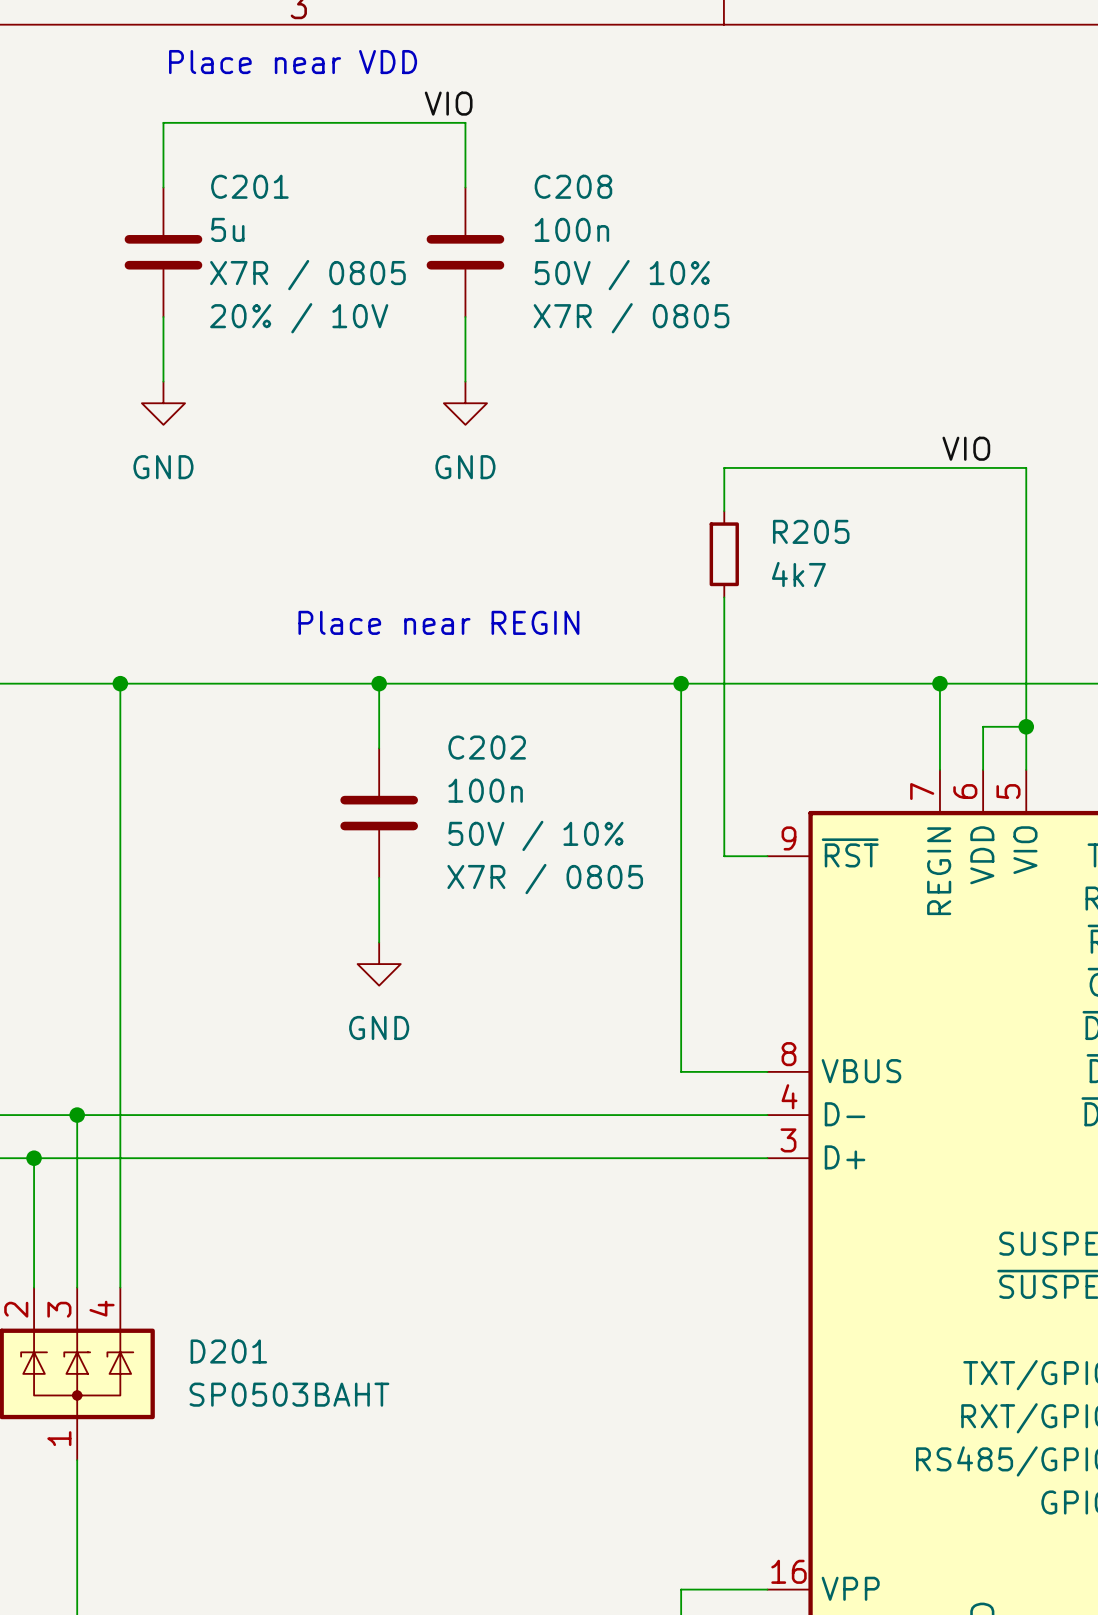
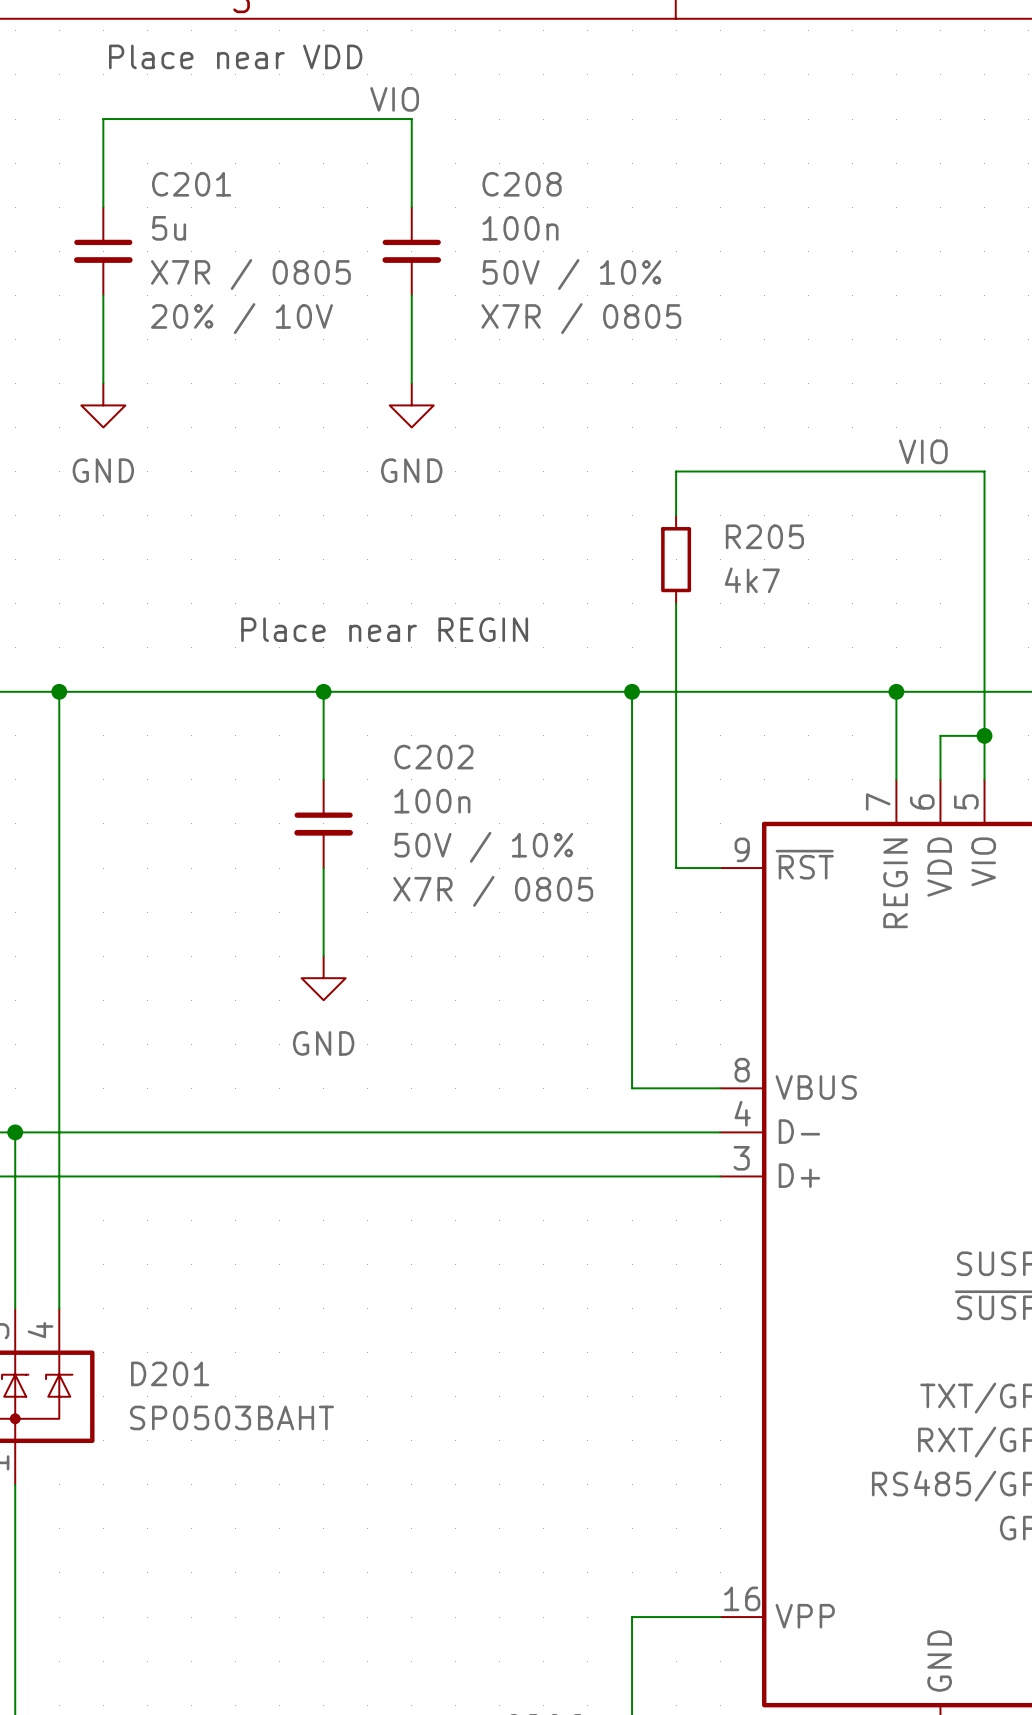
C201 symbol: [124, 187, 203, 317] -> [74, 207, 133, 296]
C208 symbol: [426, 187, 505, 317] -> [382, 207, 442, 296]
C202 symbol: [340, 748, 418, 878] -> [294, 779, 353, 869]

